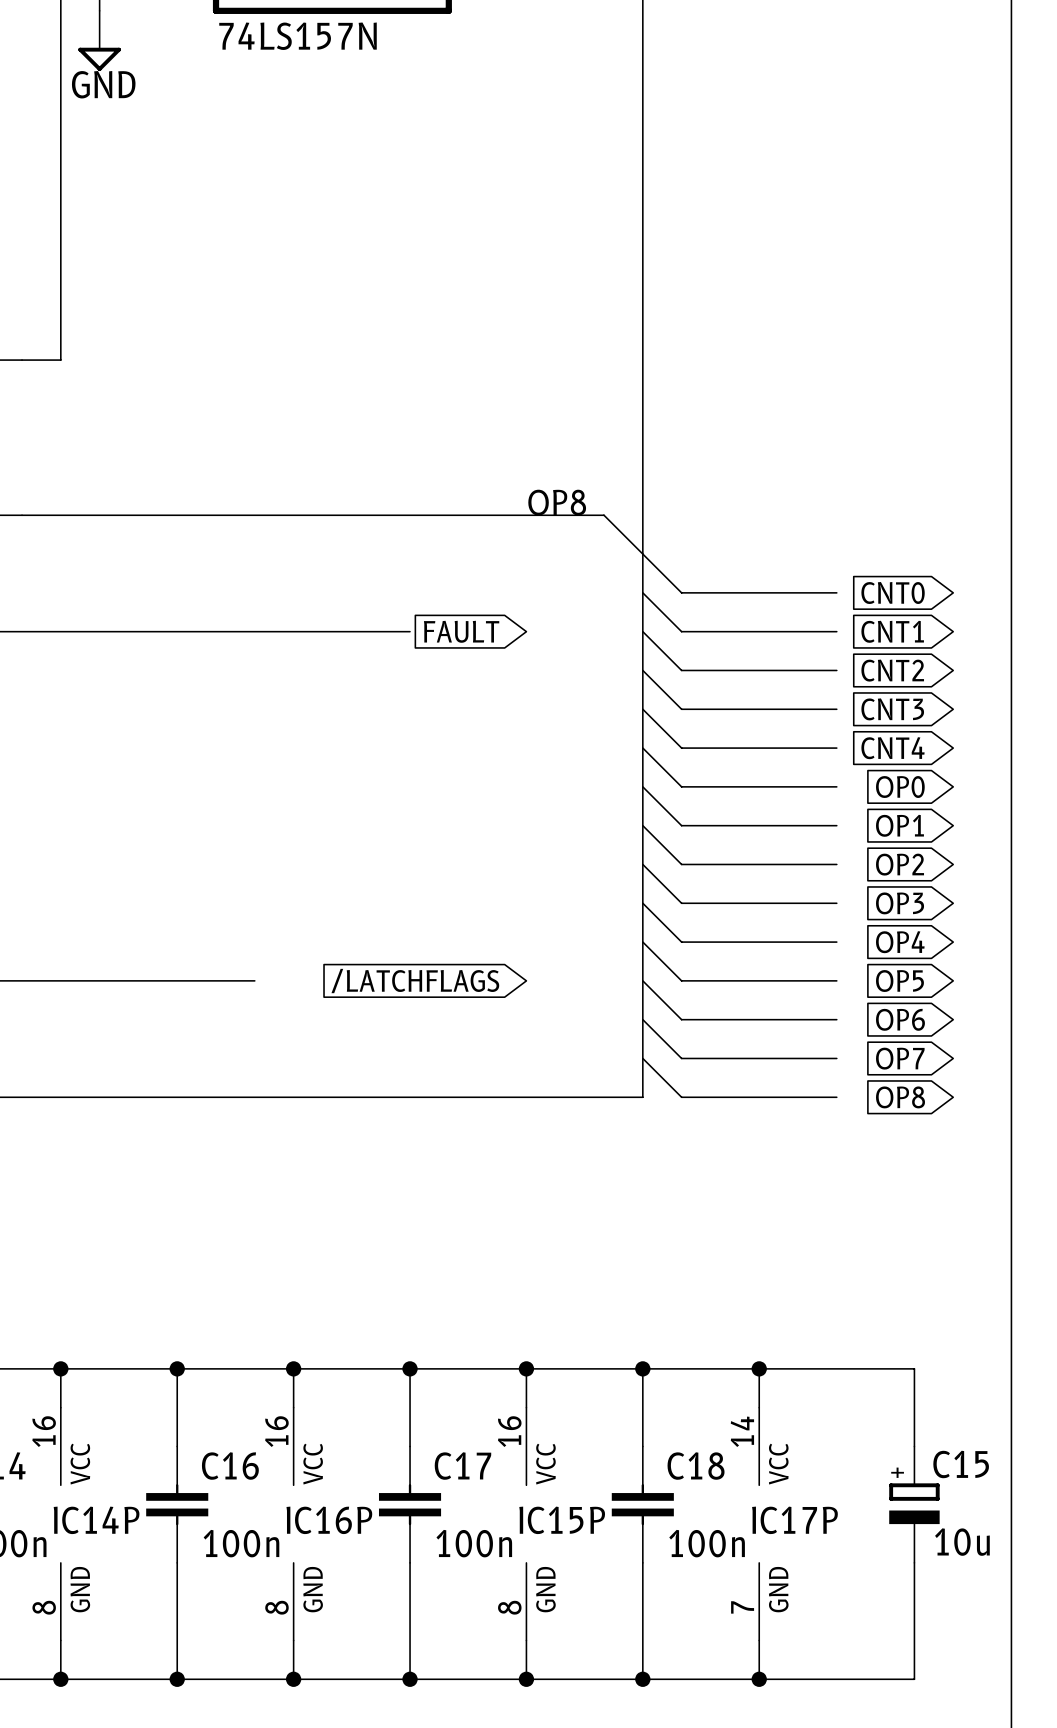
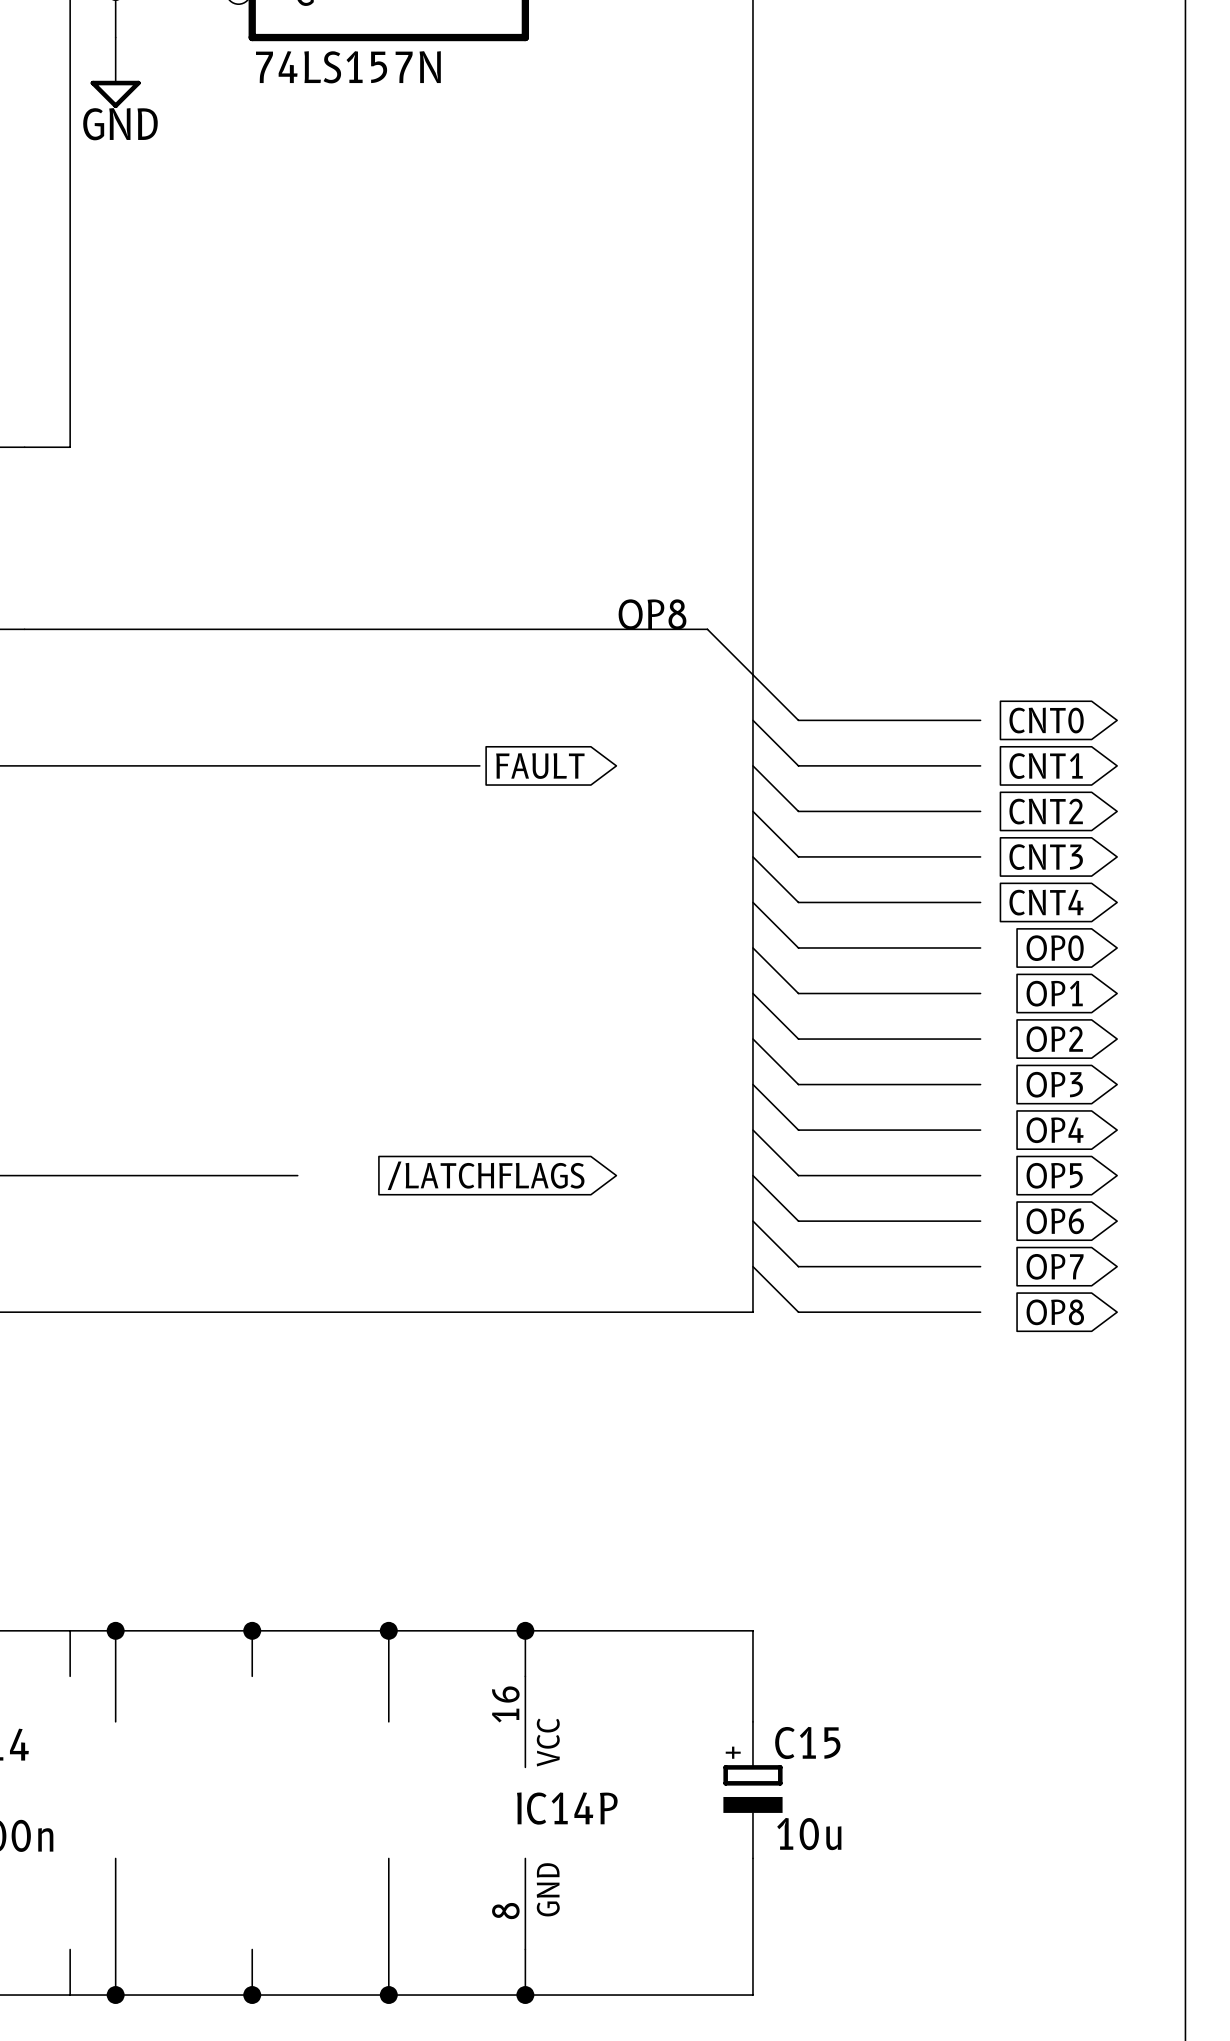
junction: (60, 1368) -> none
junction: none -> (115, 1630)
wire: (177, 1368) (177, 1446) -> (115, 1630) (115, 1721)
junction: (177, 1368) -> none
junction: none -> (252, 1630)
wire: (293, 1368) (293, 1407) -> (252, 1630) (252, 1676)
junction: (293, 1368) -> none
junction: none -> (388, 1630)
wire: (410, 1368) (410, 1446) -> (388, 1630) (388, 1721)
junction: (410, 1368) -> none
junction: none -> (525, 1630)
wire: (526, 1368) (526, 1407) -> (525, 1630) (525, 1676)
junction: (526, 1368) -> none
wire: (642, 1368) (914, 1368) (914, 1446) -> none
junction: (642, 1368) -> none
wire: (759, 1368) (759, 1407) -> none
junction: (759, 1368) -> none
C16: 100n (177, 1504) -> none
C17: 100n (410, 1504) -> none
C18: 100n (642, 1504) -> none
C15 position: (914, 1504) -> (752, 1790)
IC14P position: (60, 1524) -> (525, 1812)
IC16P: (293, 1524) -> none
IC15P: (526, 1524) -> none
IC17P: (759, 1524) -> none
wire: (177, 1562) (177, 1679) -> (115, 1858) (115, 1995)
wire: (410, 1562) (410, 1679) -> (388, 1858) (388, 1995)
wire: (914, 1562) (914, 1679) (642, 1679) -> none
wire: (293, 1640) (293, 1679) -> (252, 1949) (252, 1995)
wire: (526, 1640) (526, 1679) -> (525, 1949) (525, 1995)
wire: (759, 1640) (759, 1679) -> none
junction: (60, 1679) -> none
junction: none -> (115, 1995)
junction: (177, 1679) -> none
junction: none -> (252, 1995)
junction: (293, 1679) -> none
junction: none -> (388, 1995)
junction: (410, 1679) -> none
junction: none -> (525, 1995)
junction: (526, 1679) -> none
junction: (642, 1679) -> none
junction: (759, 1679) -> none

